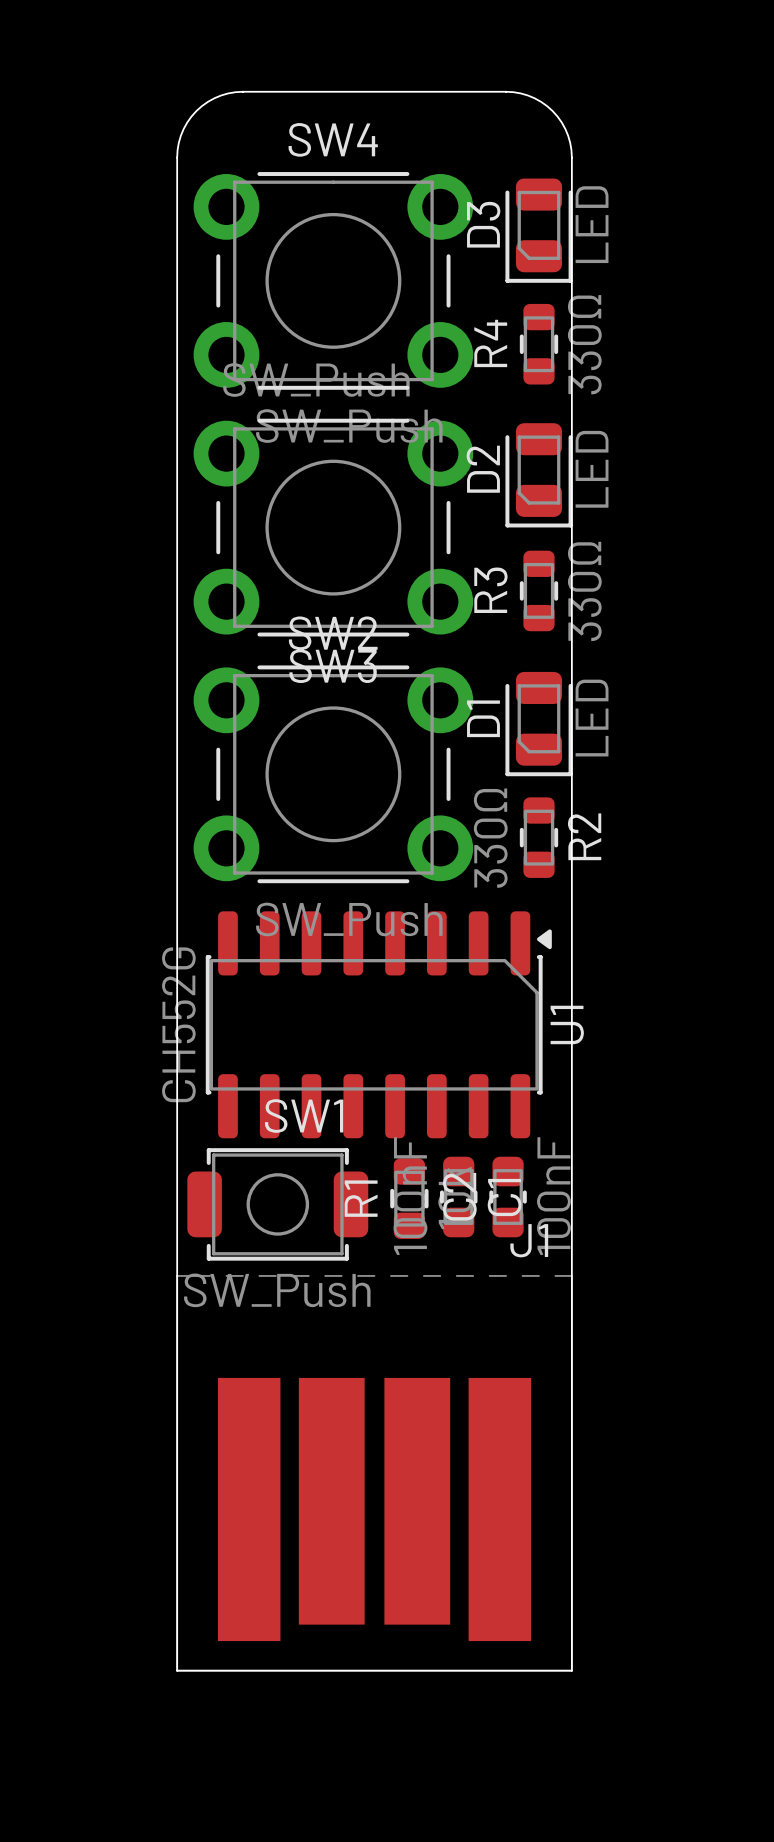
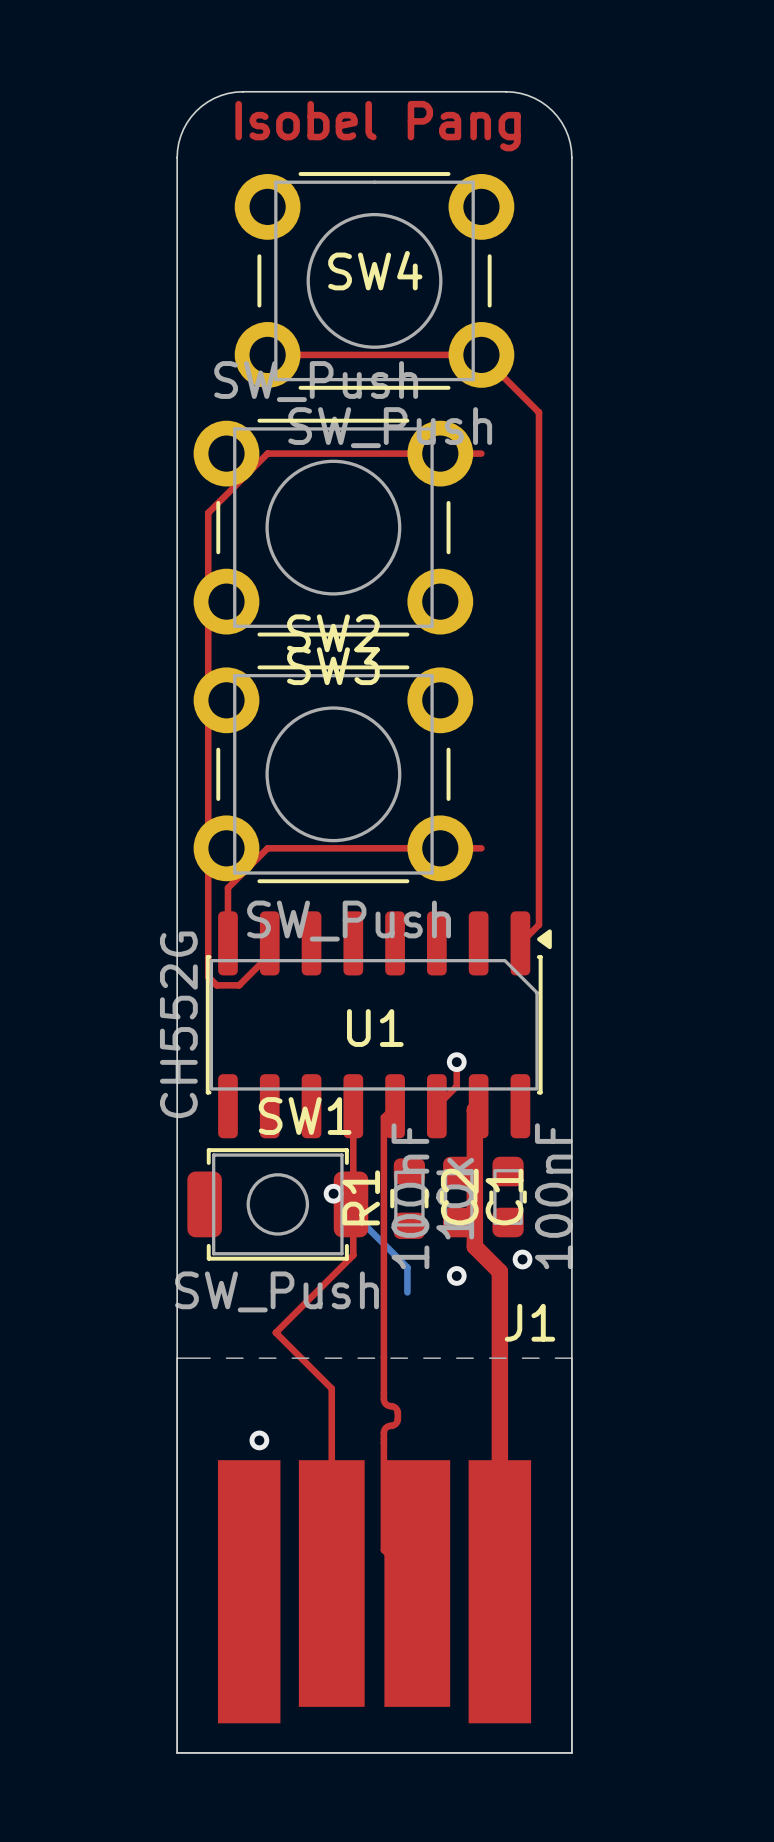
text: none -> Isobel Pang (378, 126)
SW4 name position: SW4 (333, 139) -> SW4 (375, 270)
D3: LED (538, 230) -> none
SW4 position: (333, 280) -> (374, 280)
R4: 330Ω (538, 344) -> none
top track: none -> (267, 354) (481, 354) (538, 412) (538, 924) (520, 943)
top track: none -> (481, 453) (267, 453) (208, 512) (208, 976) (216, 985) (239, 985) (269, 954) (269, 943)
D2: LED (538, 475) -> none
R3: 330Ω (538, 590) -> none
D1: LED (538, 724) -> none
R2: 330Ω (538, 837) -> none
top track: none -> (481, 848) (267, 848) (227, 887) (227, 943)
U1 name rotation: 0° (567, 1024) -> 90° clockwise (375, 1028)
U1 name position: U1 (567, 1024) -> U1 (375, 1028)
top track: none -> (456, 1062) (456, 1086) (436, 1106)
via: none -> (456, 1062)
top track: none -> (353, 1106) (353, 1255) (275, 1332) (331, 1388) (331, 1583)
top track: none -> (478, 1106) (474, 1110) (474, 1246) (499, 1271) (499, 1591)
top track: none -> (395, 1127) (395, 1106) (383, 1117) (383, 1399) (386, 1404) (395, 1408) (397, 1413) (396, 1423) (386, 1427) (383, 1432) (383, 1550) (417, 1583)
bottom track: none -> (333, 1193) (407, 1267) (407, 1292)
via: none -> (333, 1193)
via: none -> (522, 1259)
via: none -> (456, 1275)
via: none -> (259, 1440)
J1 position: (374, 1473) -> (374, 1555)
board edge: (177, 1670) (571, 1670) -> (177, 1670) (177, 1752) (571, 1752) (571, 1670)

